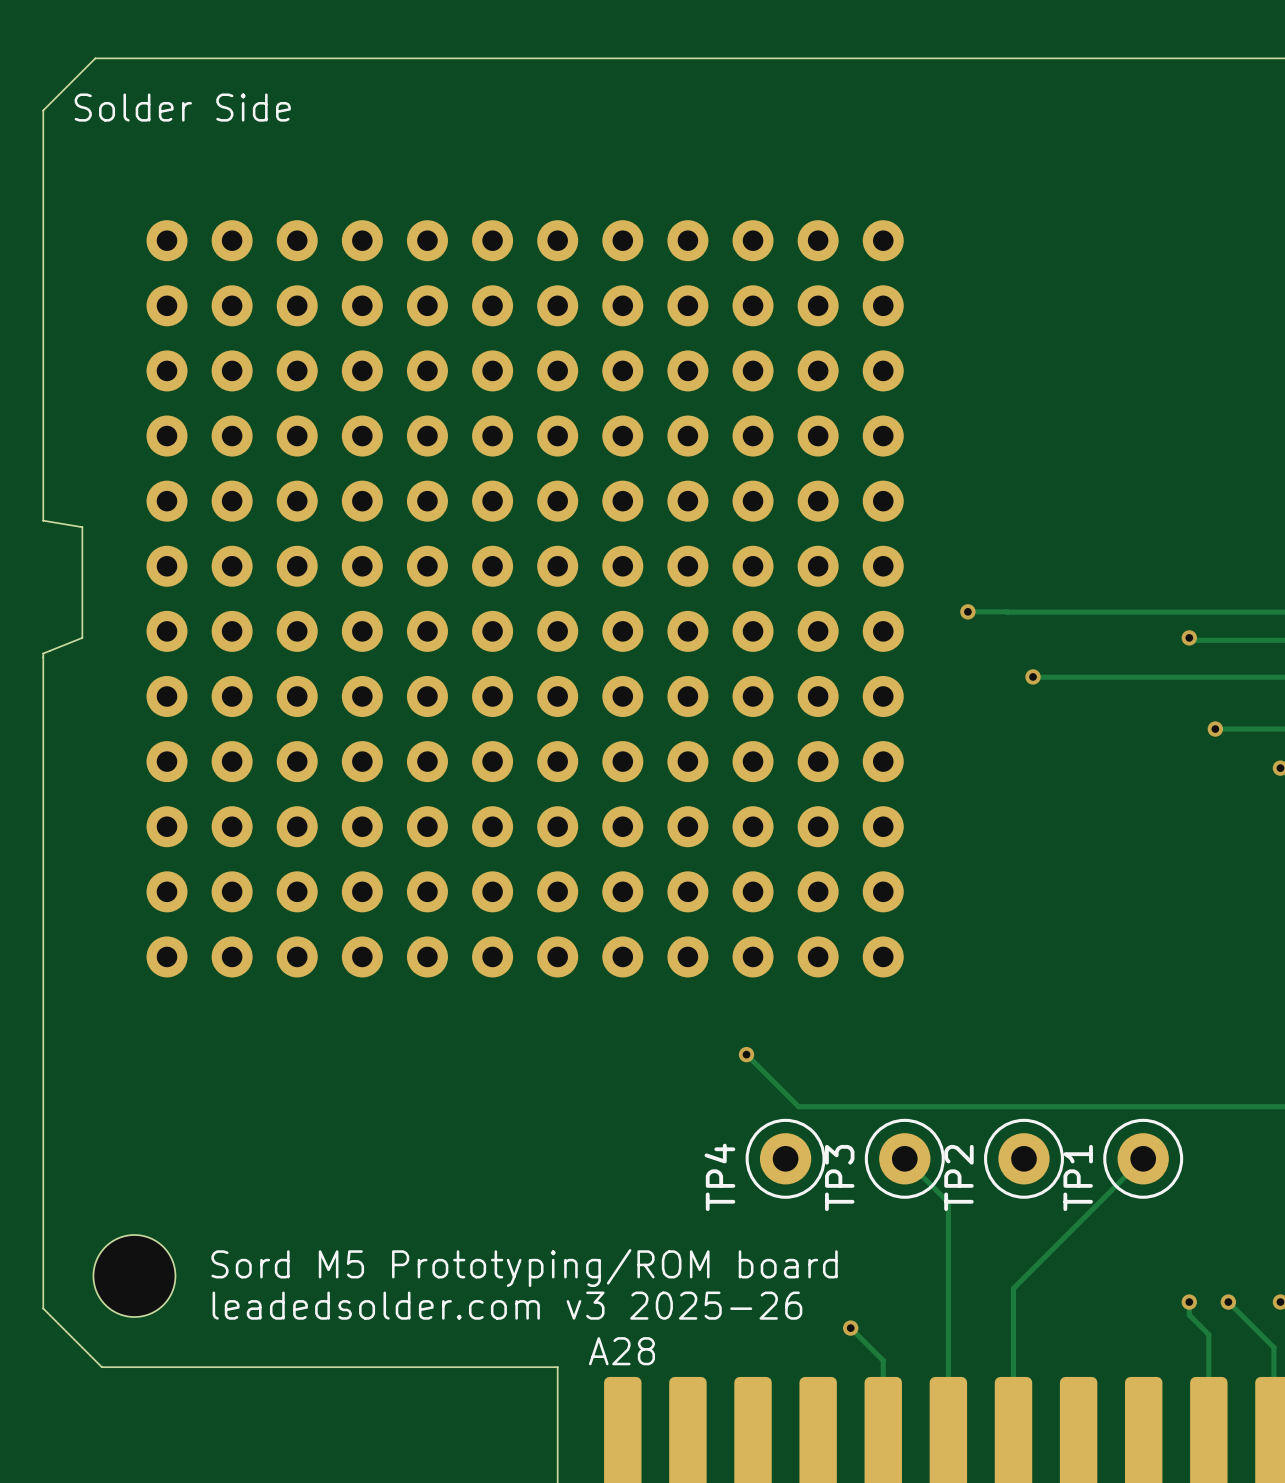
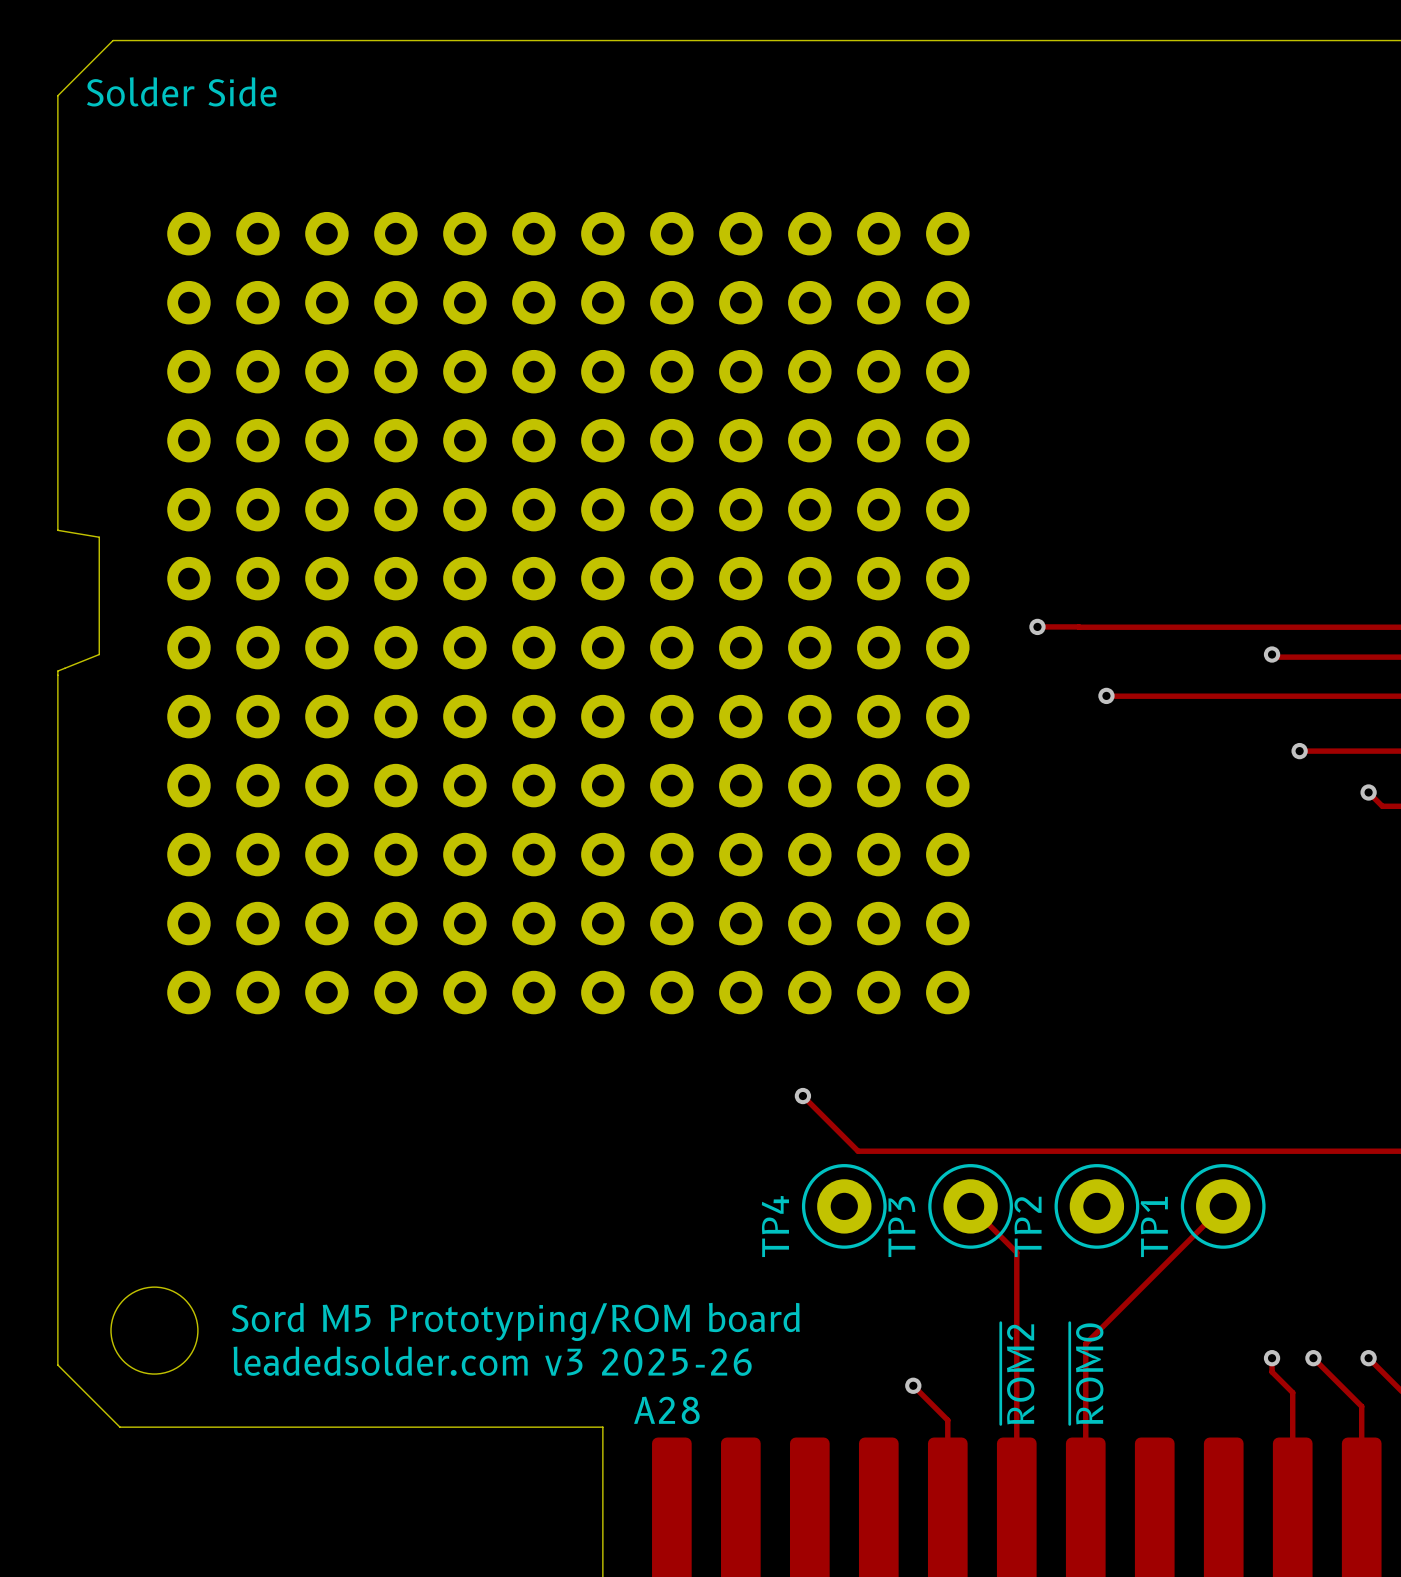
text: none -> ~{ROM2} (1017, 1373)
text: none -> ~{ROM0} (1086, 1373)

